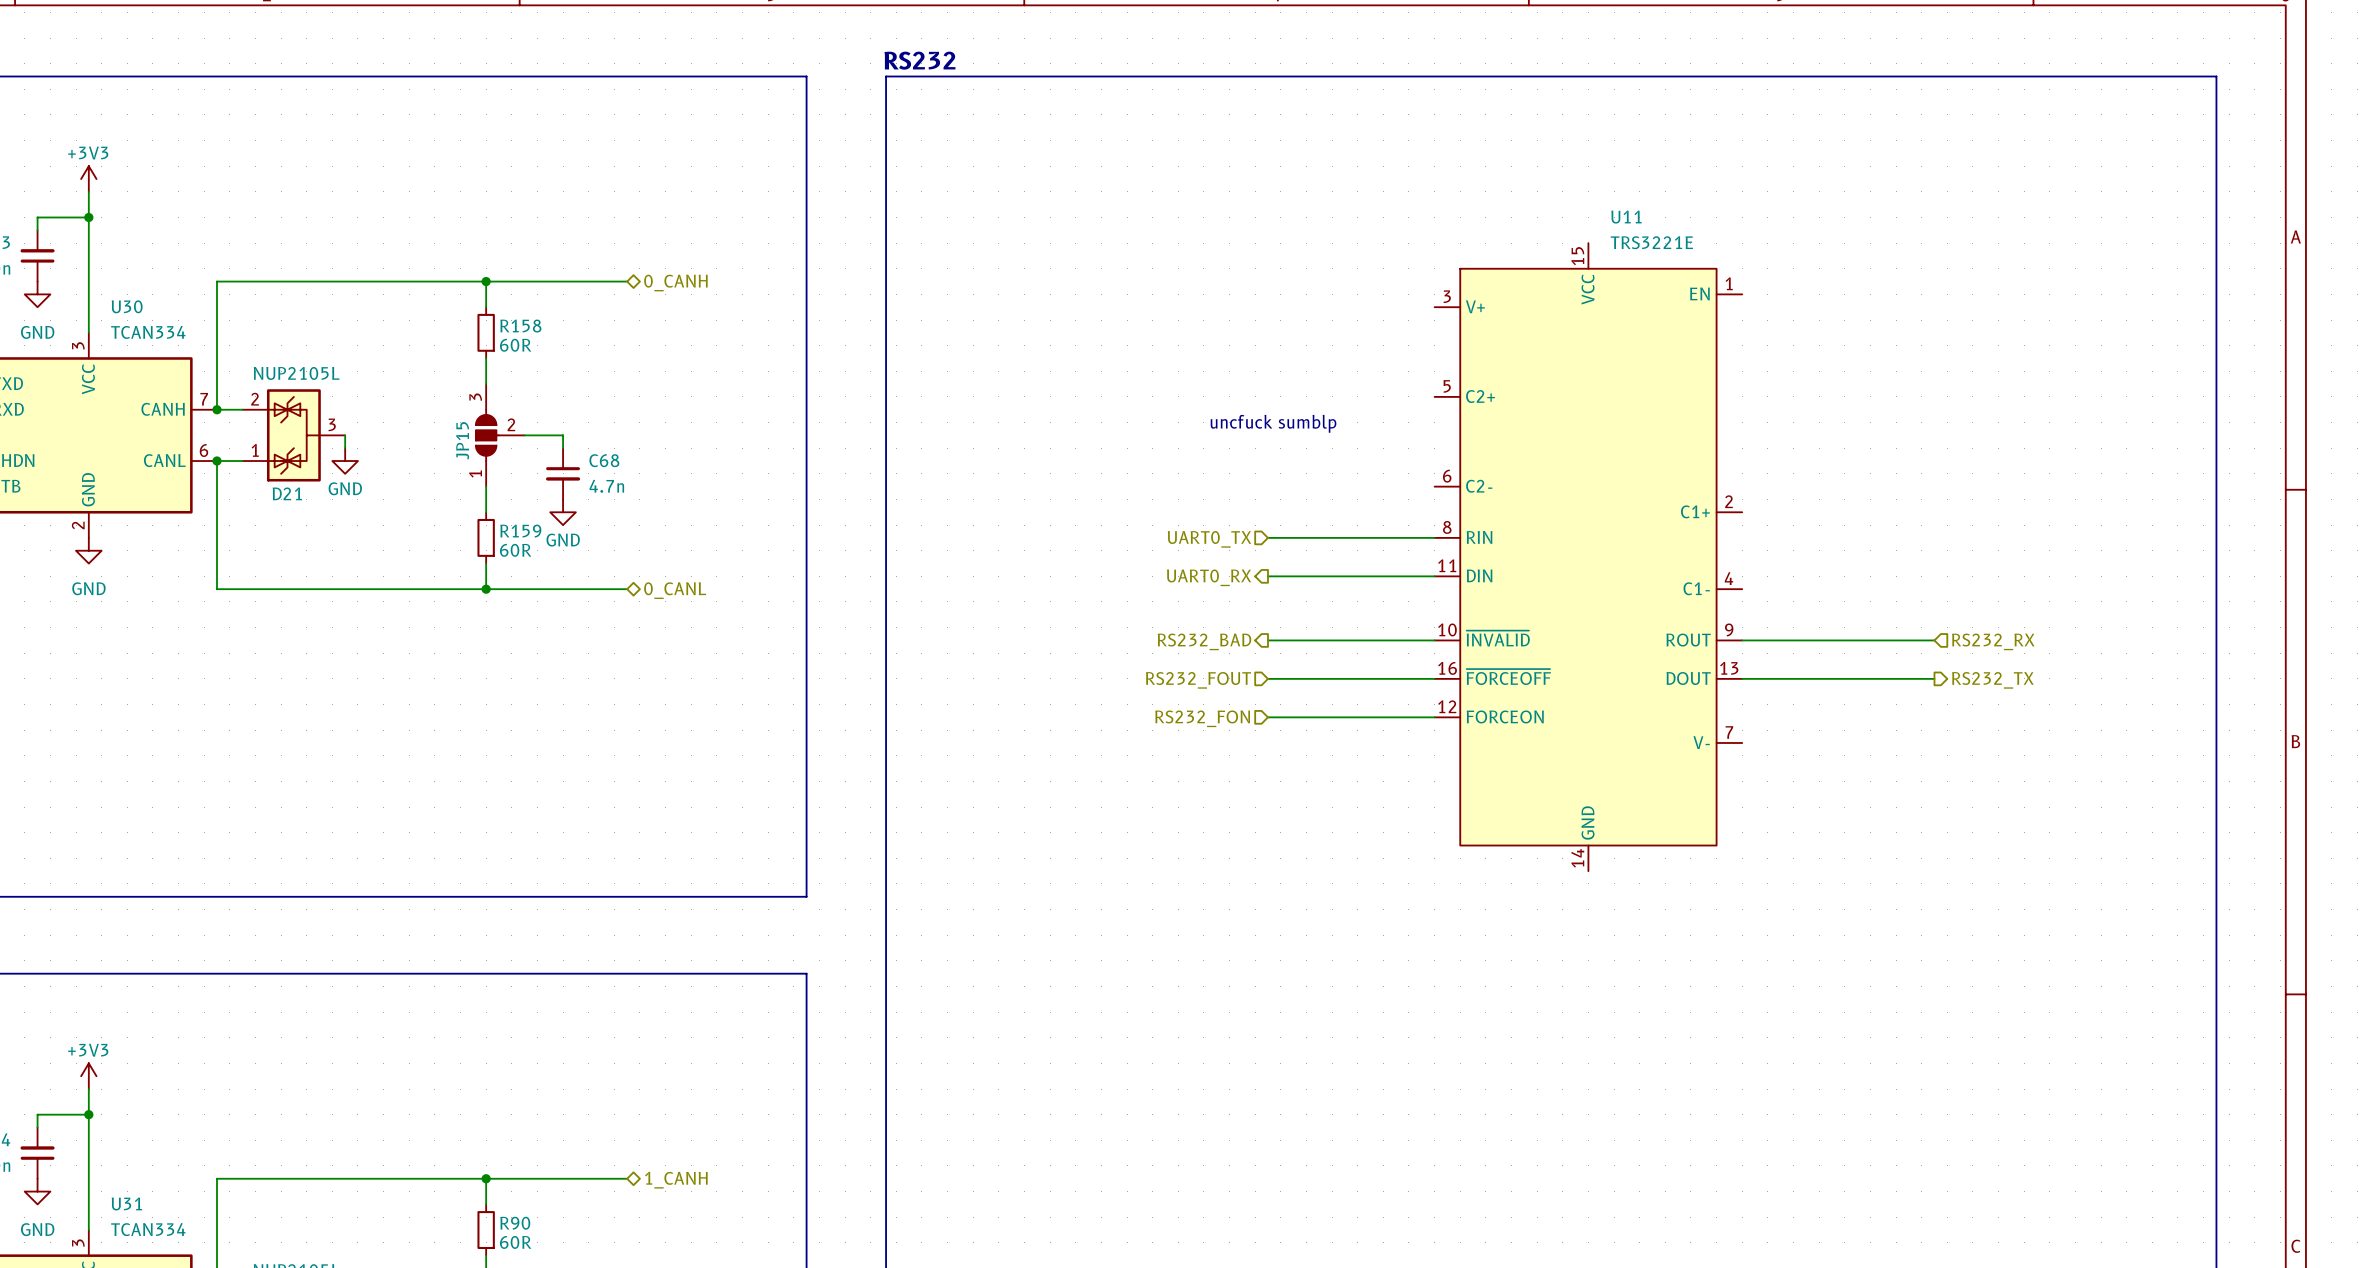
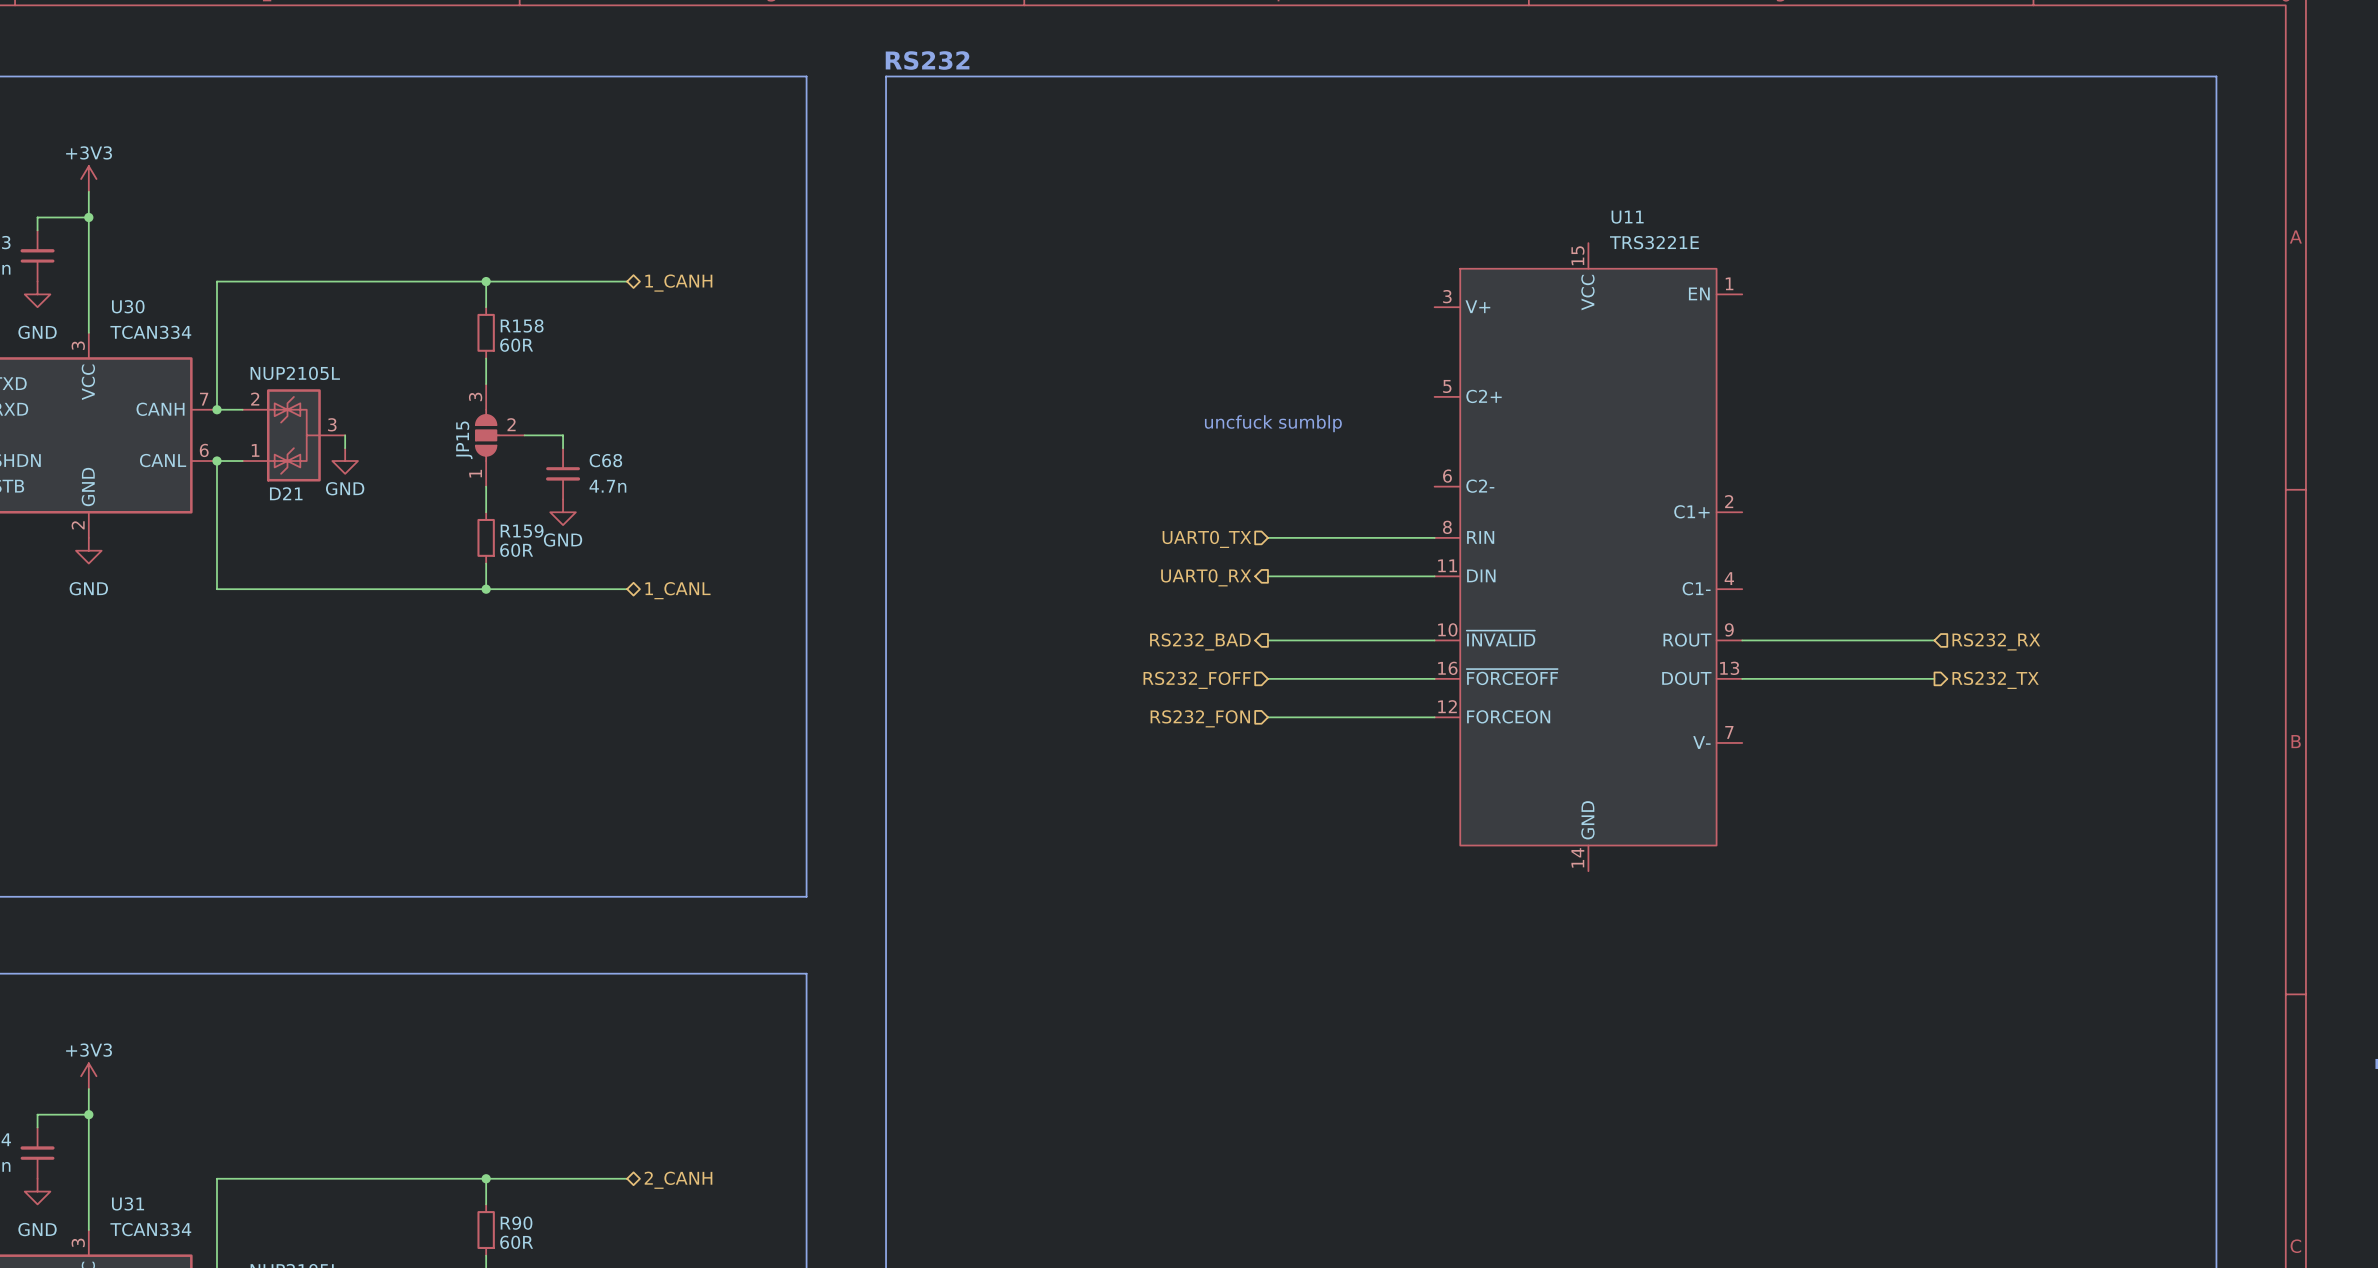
hierarchical label: 0_CANH (675, 283) -> 1_CANH (678, 283)
hierarchical label: 0_CANL (675, 590) -> 1_CANL (677, 590)
hierarchical label: RS232_FOUT (1198, 680) -> RS232_FOFF (1197, 680)
hierarchical label: 1_CANH (676, 1180) -> 2_CANH (678, 1180)

